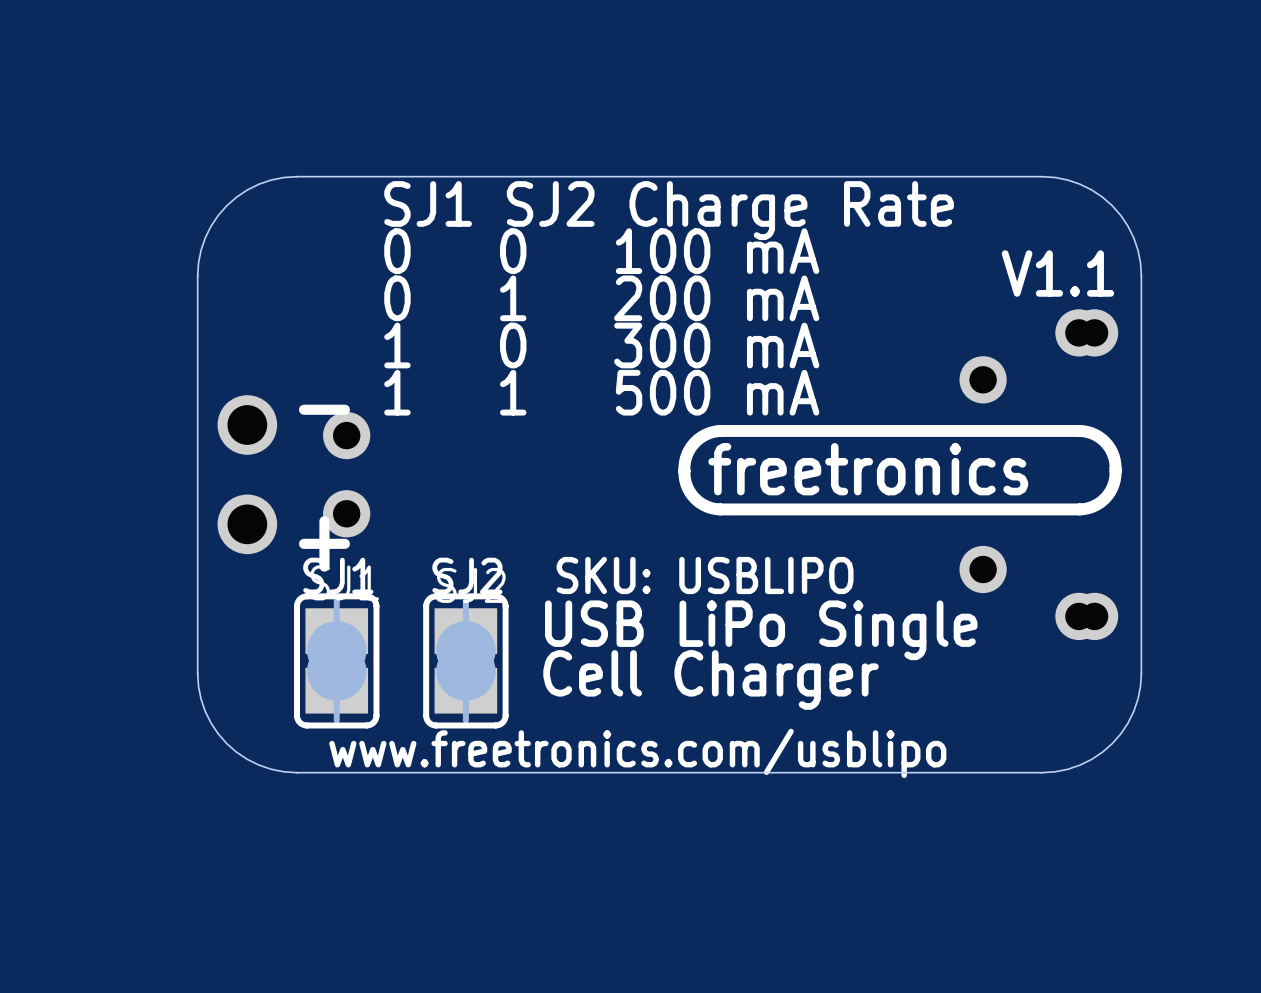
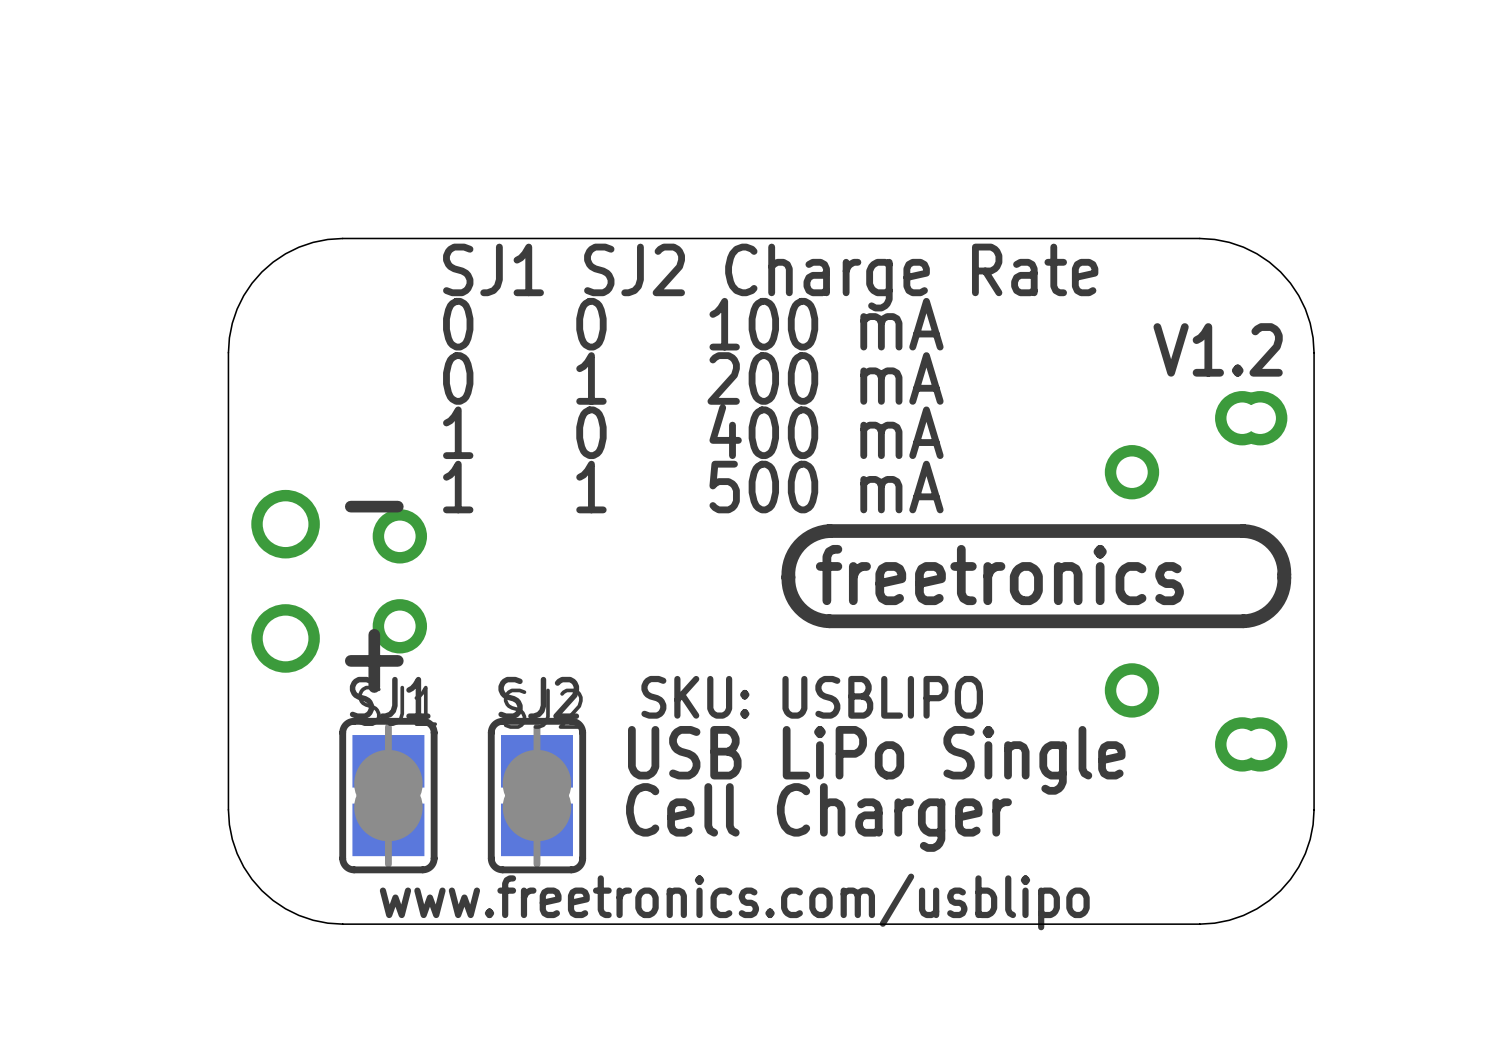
text: V1.1 (1057, 273) -> V1.2 (1218, 349)
text: 1 0 300 mA (601, 345) -> 1 0 400 mA (693, 431)

